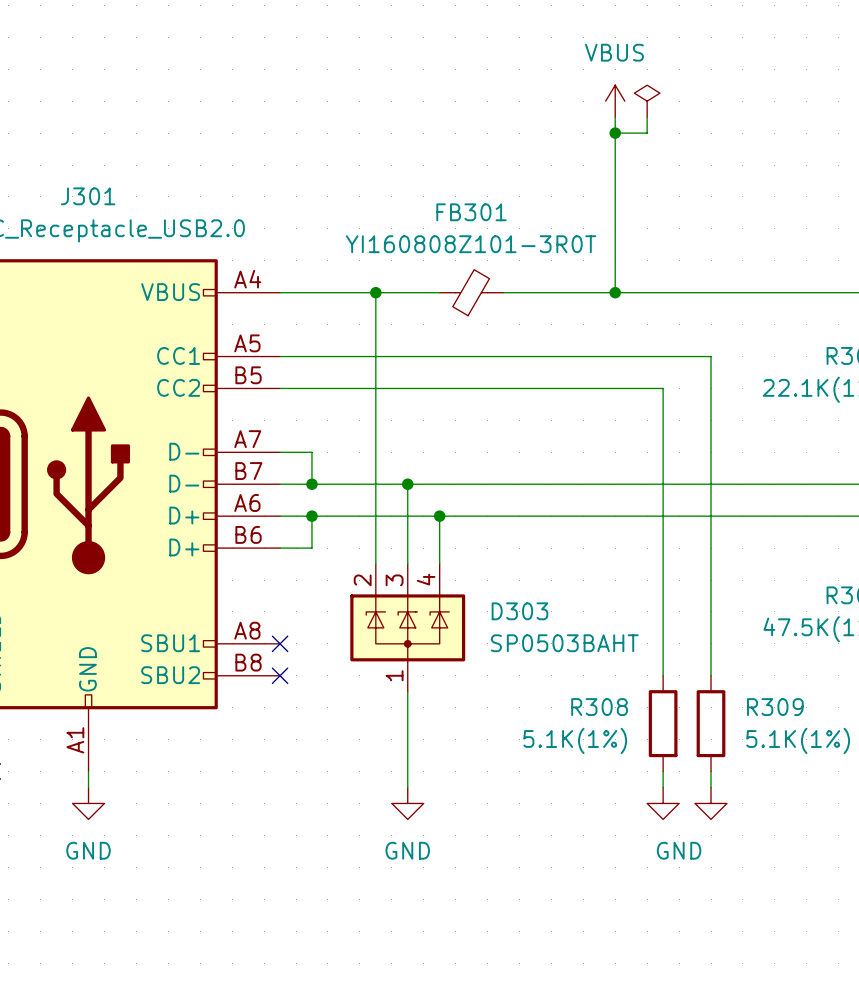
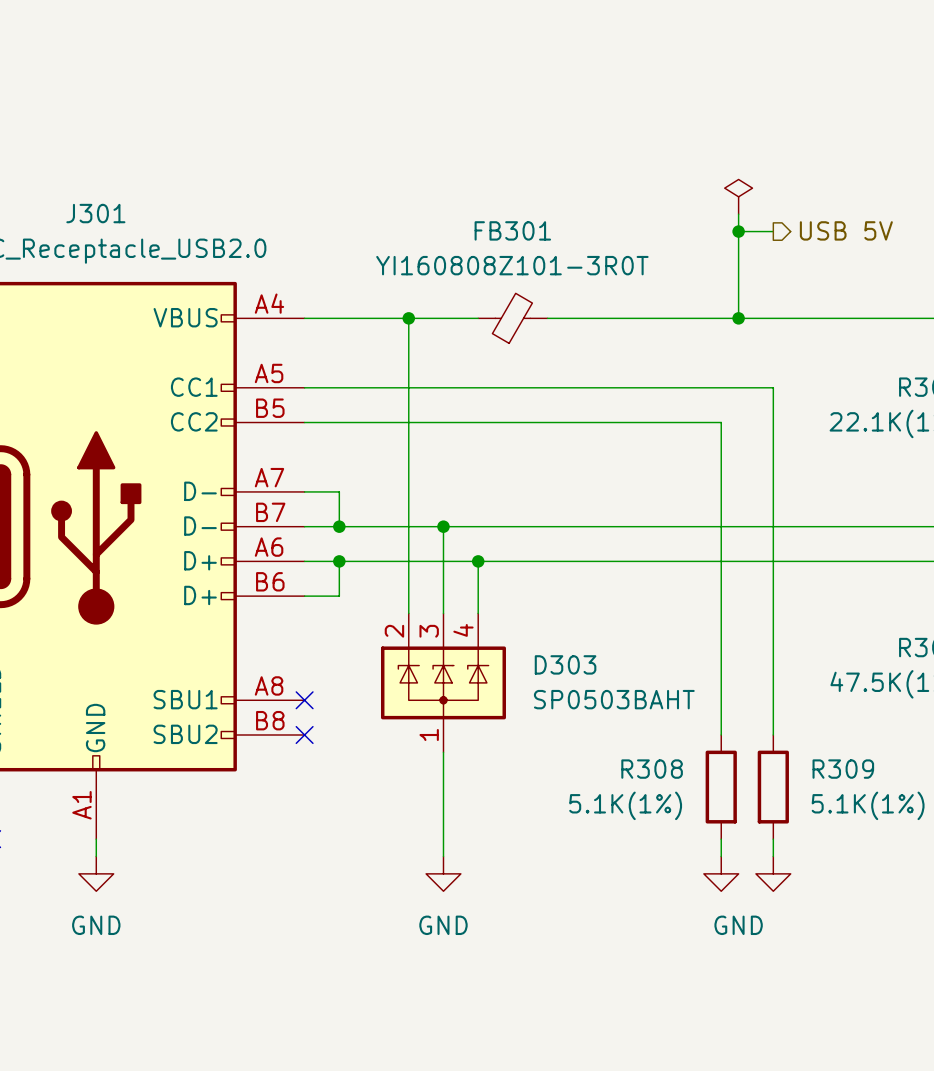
power symbol: VBUS (615, 101) -> none
power symbol position: (647, 101) -> (738, 196)
wire: (615, 117) (615, 292) -> none
wire: (647, 117) (647, 133) (615, 133) -> none
junction: (615, 133) -> none
wire: none -> (738, 214) (738, 318)
wire: none -> (738, 231) (773, 231)
junction: none -> (738, 231)
hierarchical label: none -> USB 5V (846, 230)
junction: (615, 292) -> none
junction: none -> (738, 318)

